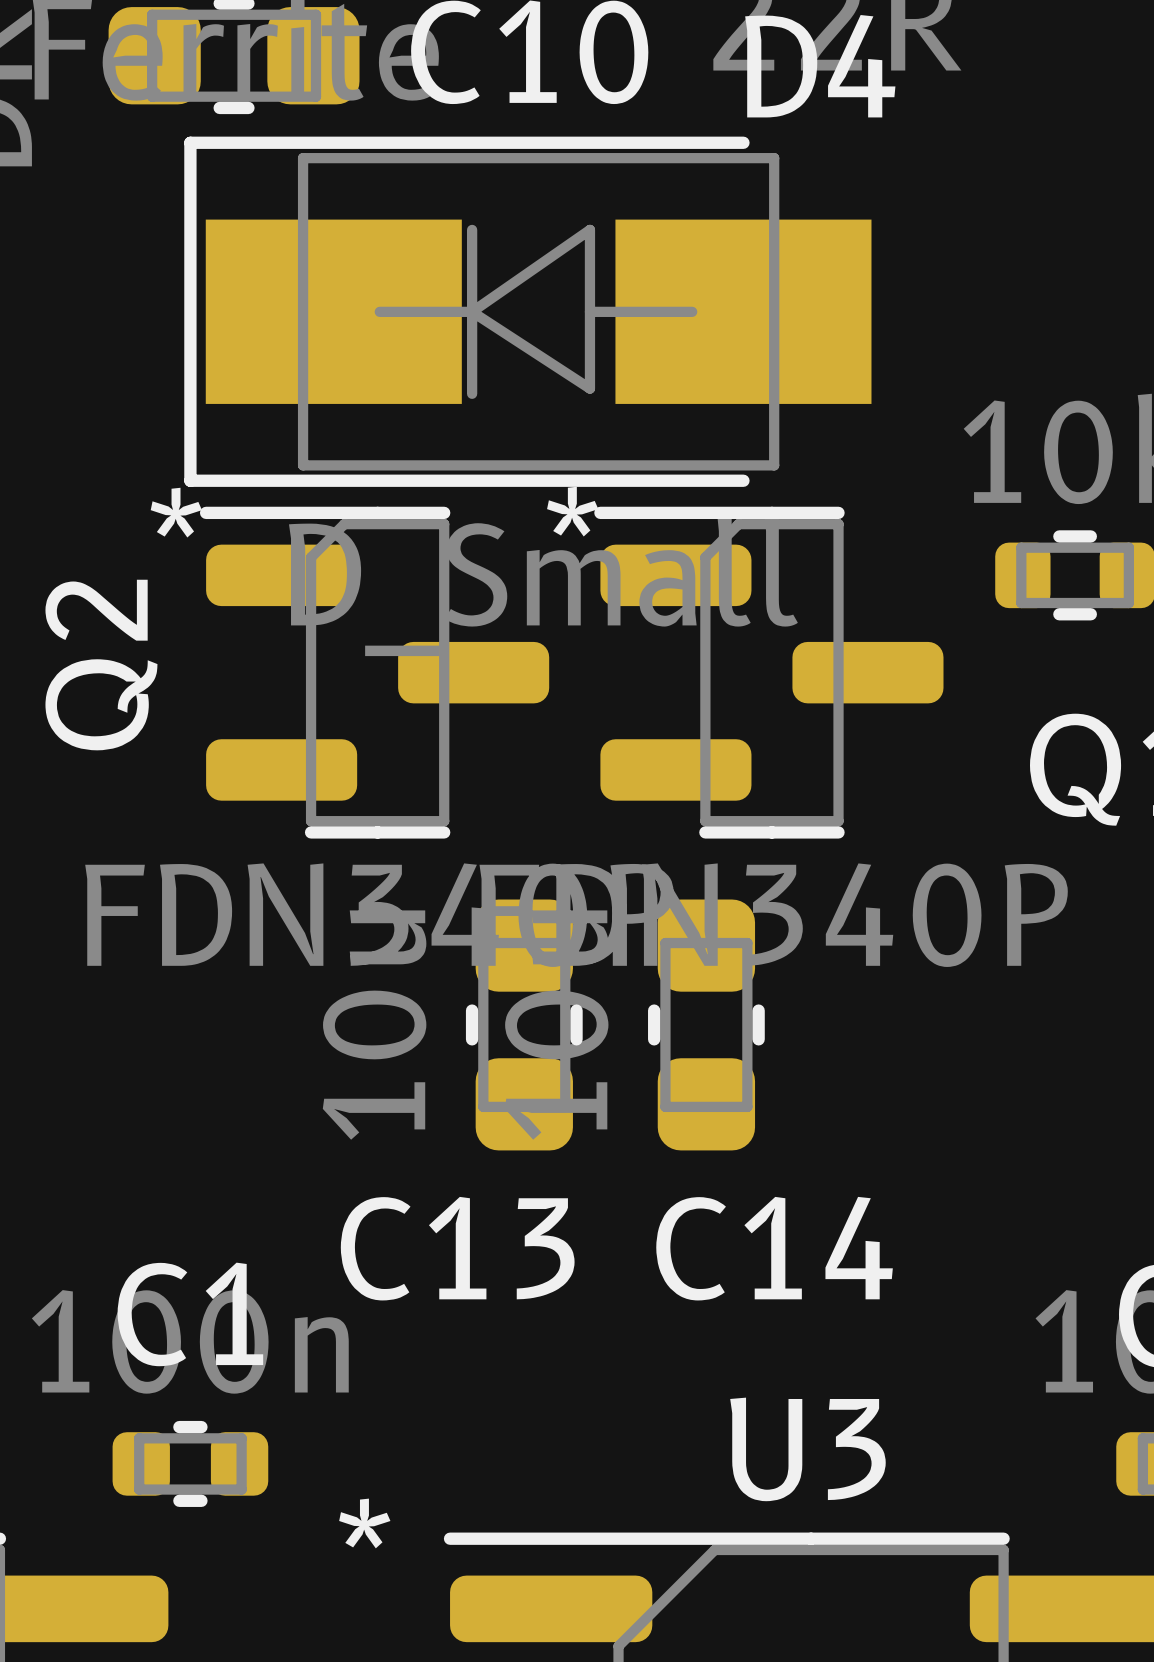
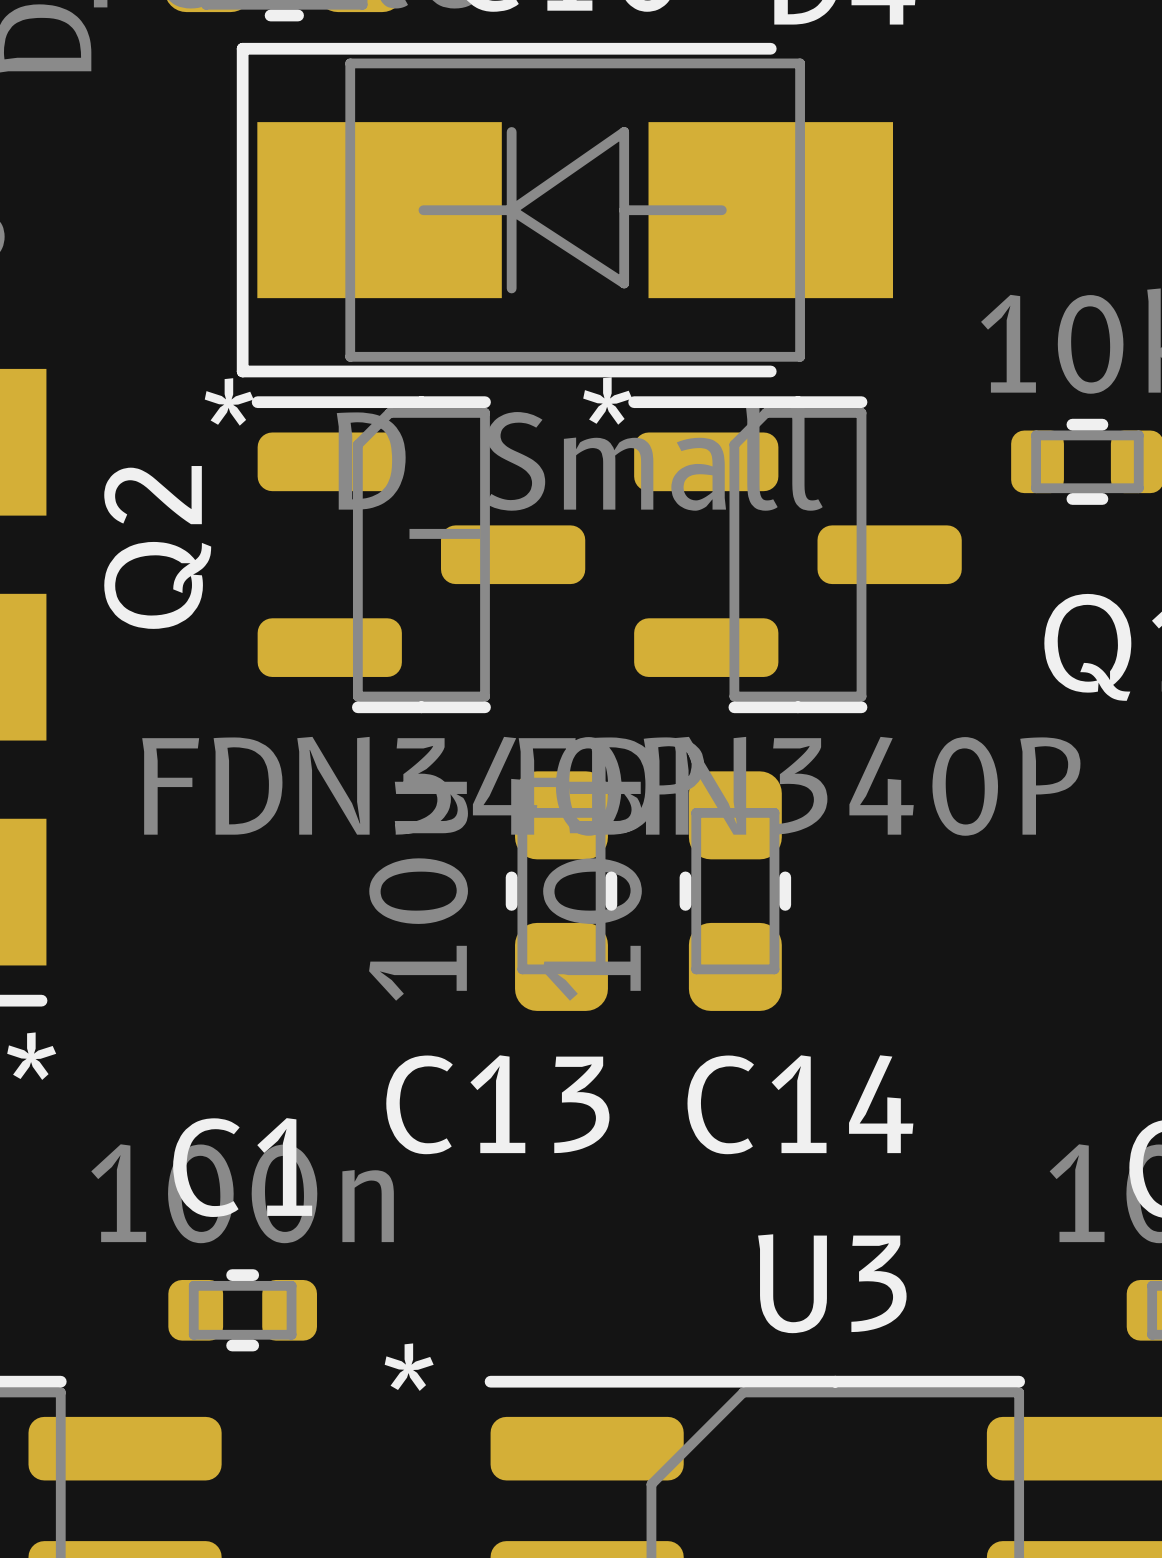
U3 name position: U3 (807, 1449) -> U3 (832, 1283)

